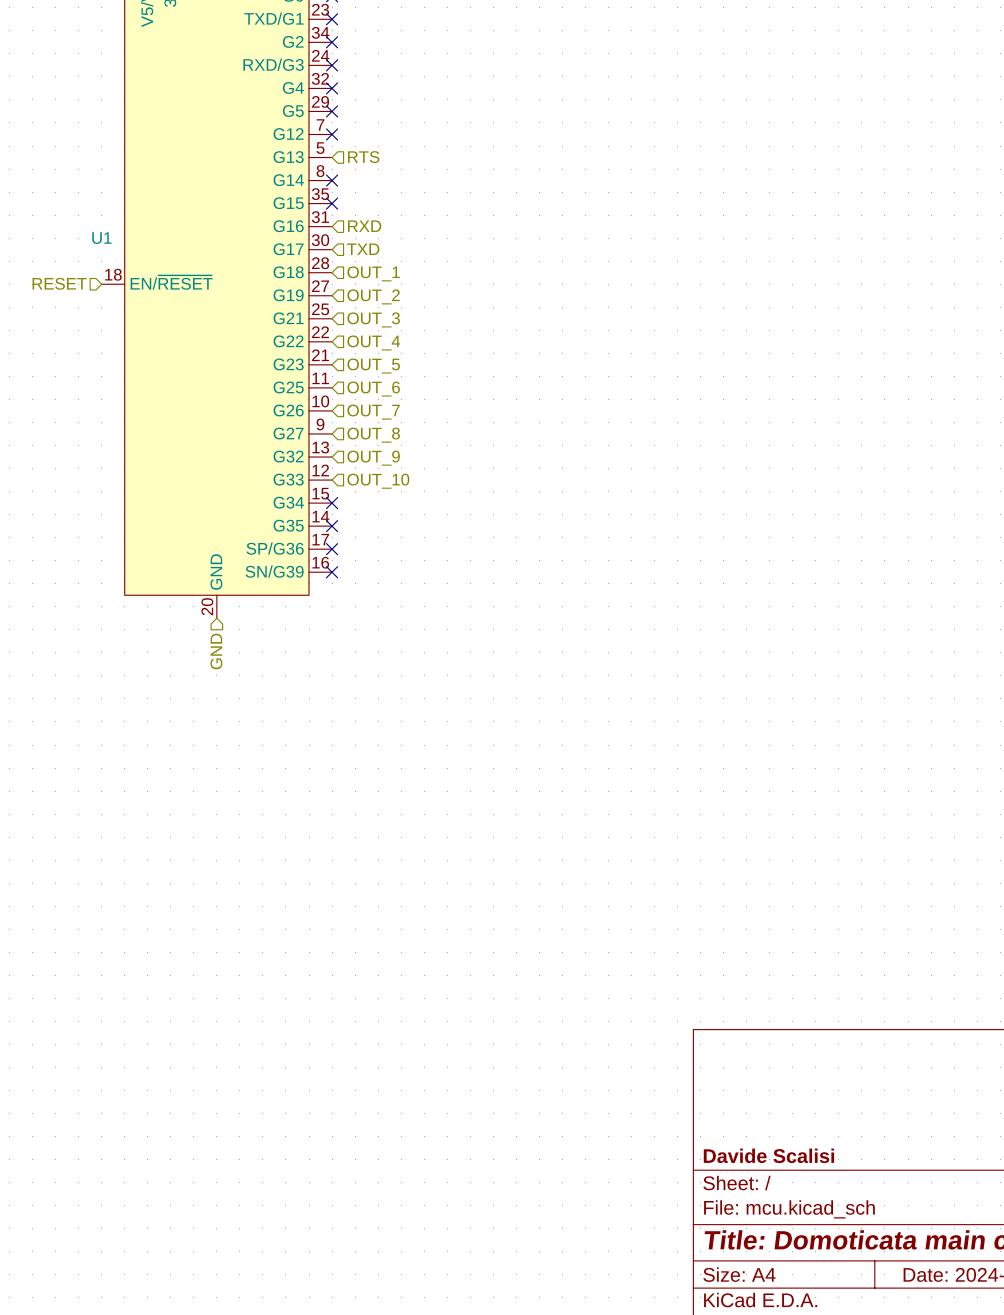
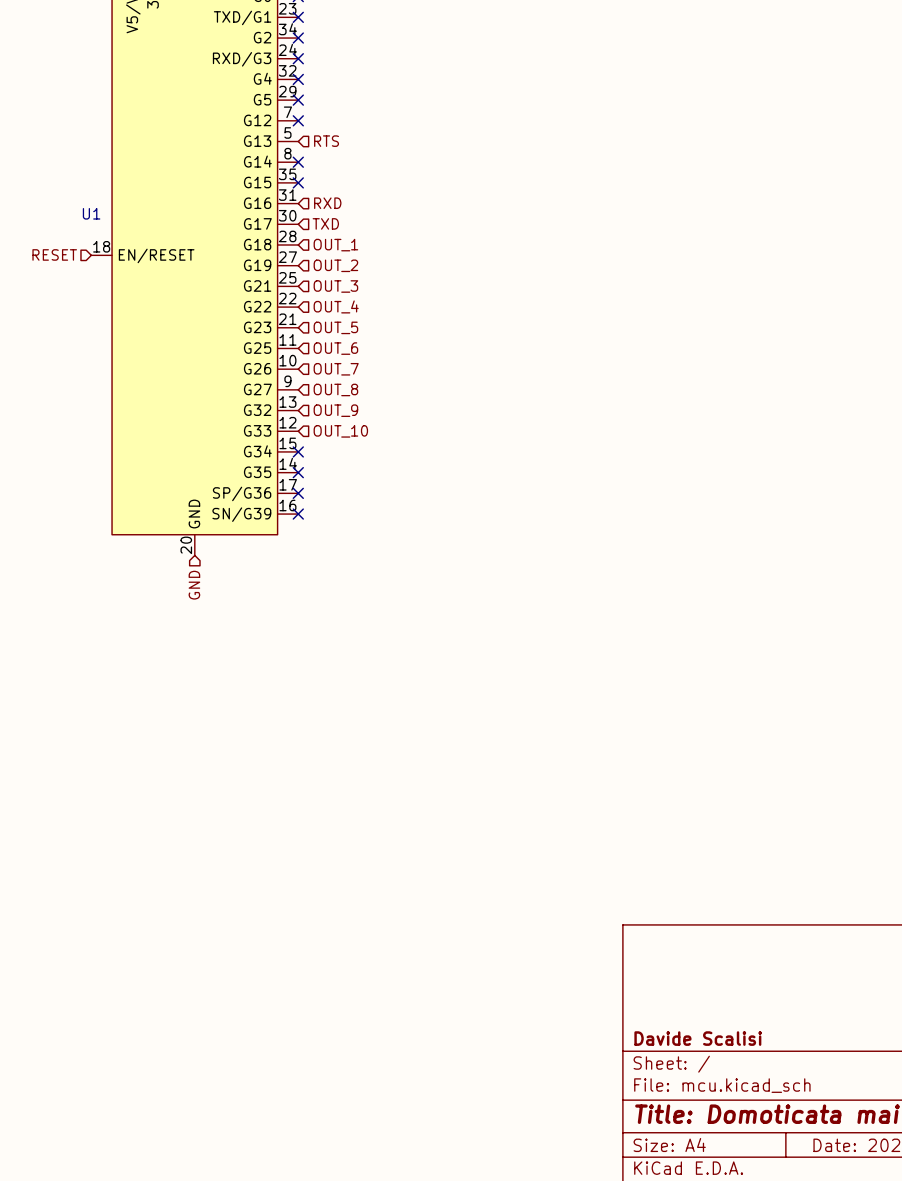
U1 pin name: EN/~{RESET} (171, 282) -> EN/RESET (156, 255)

